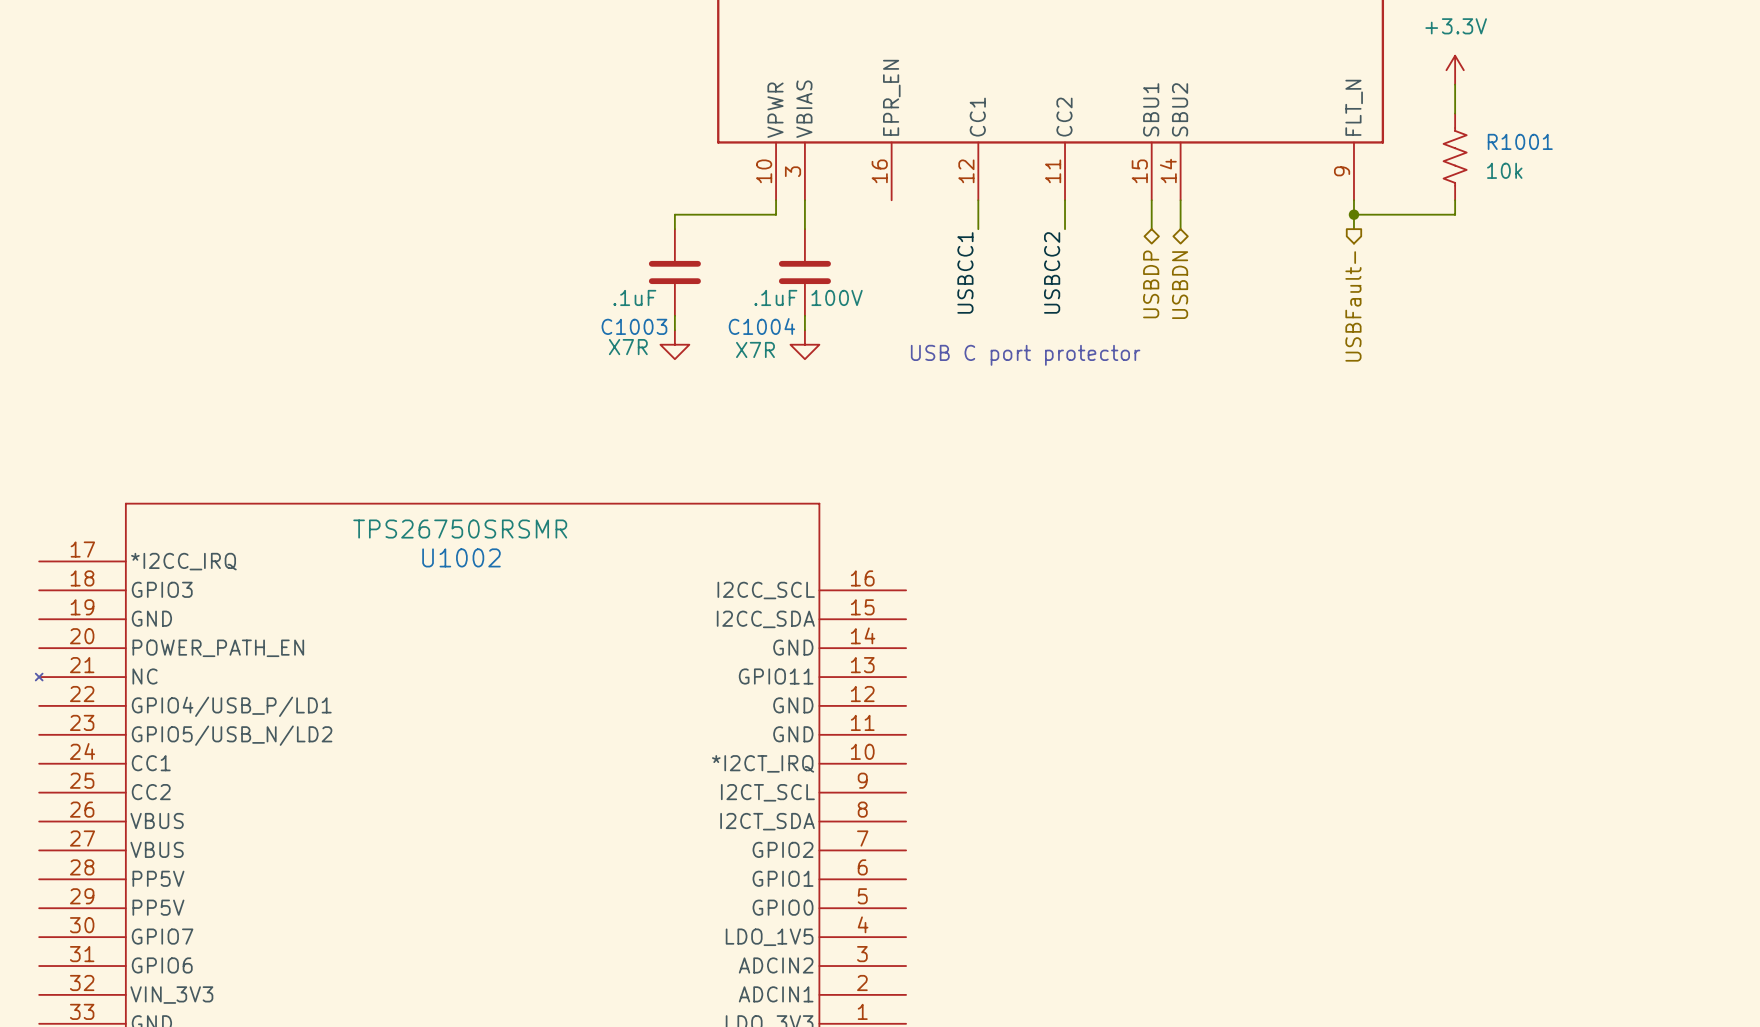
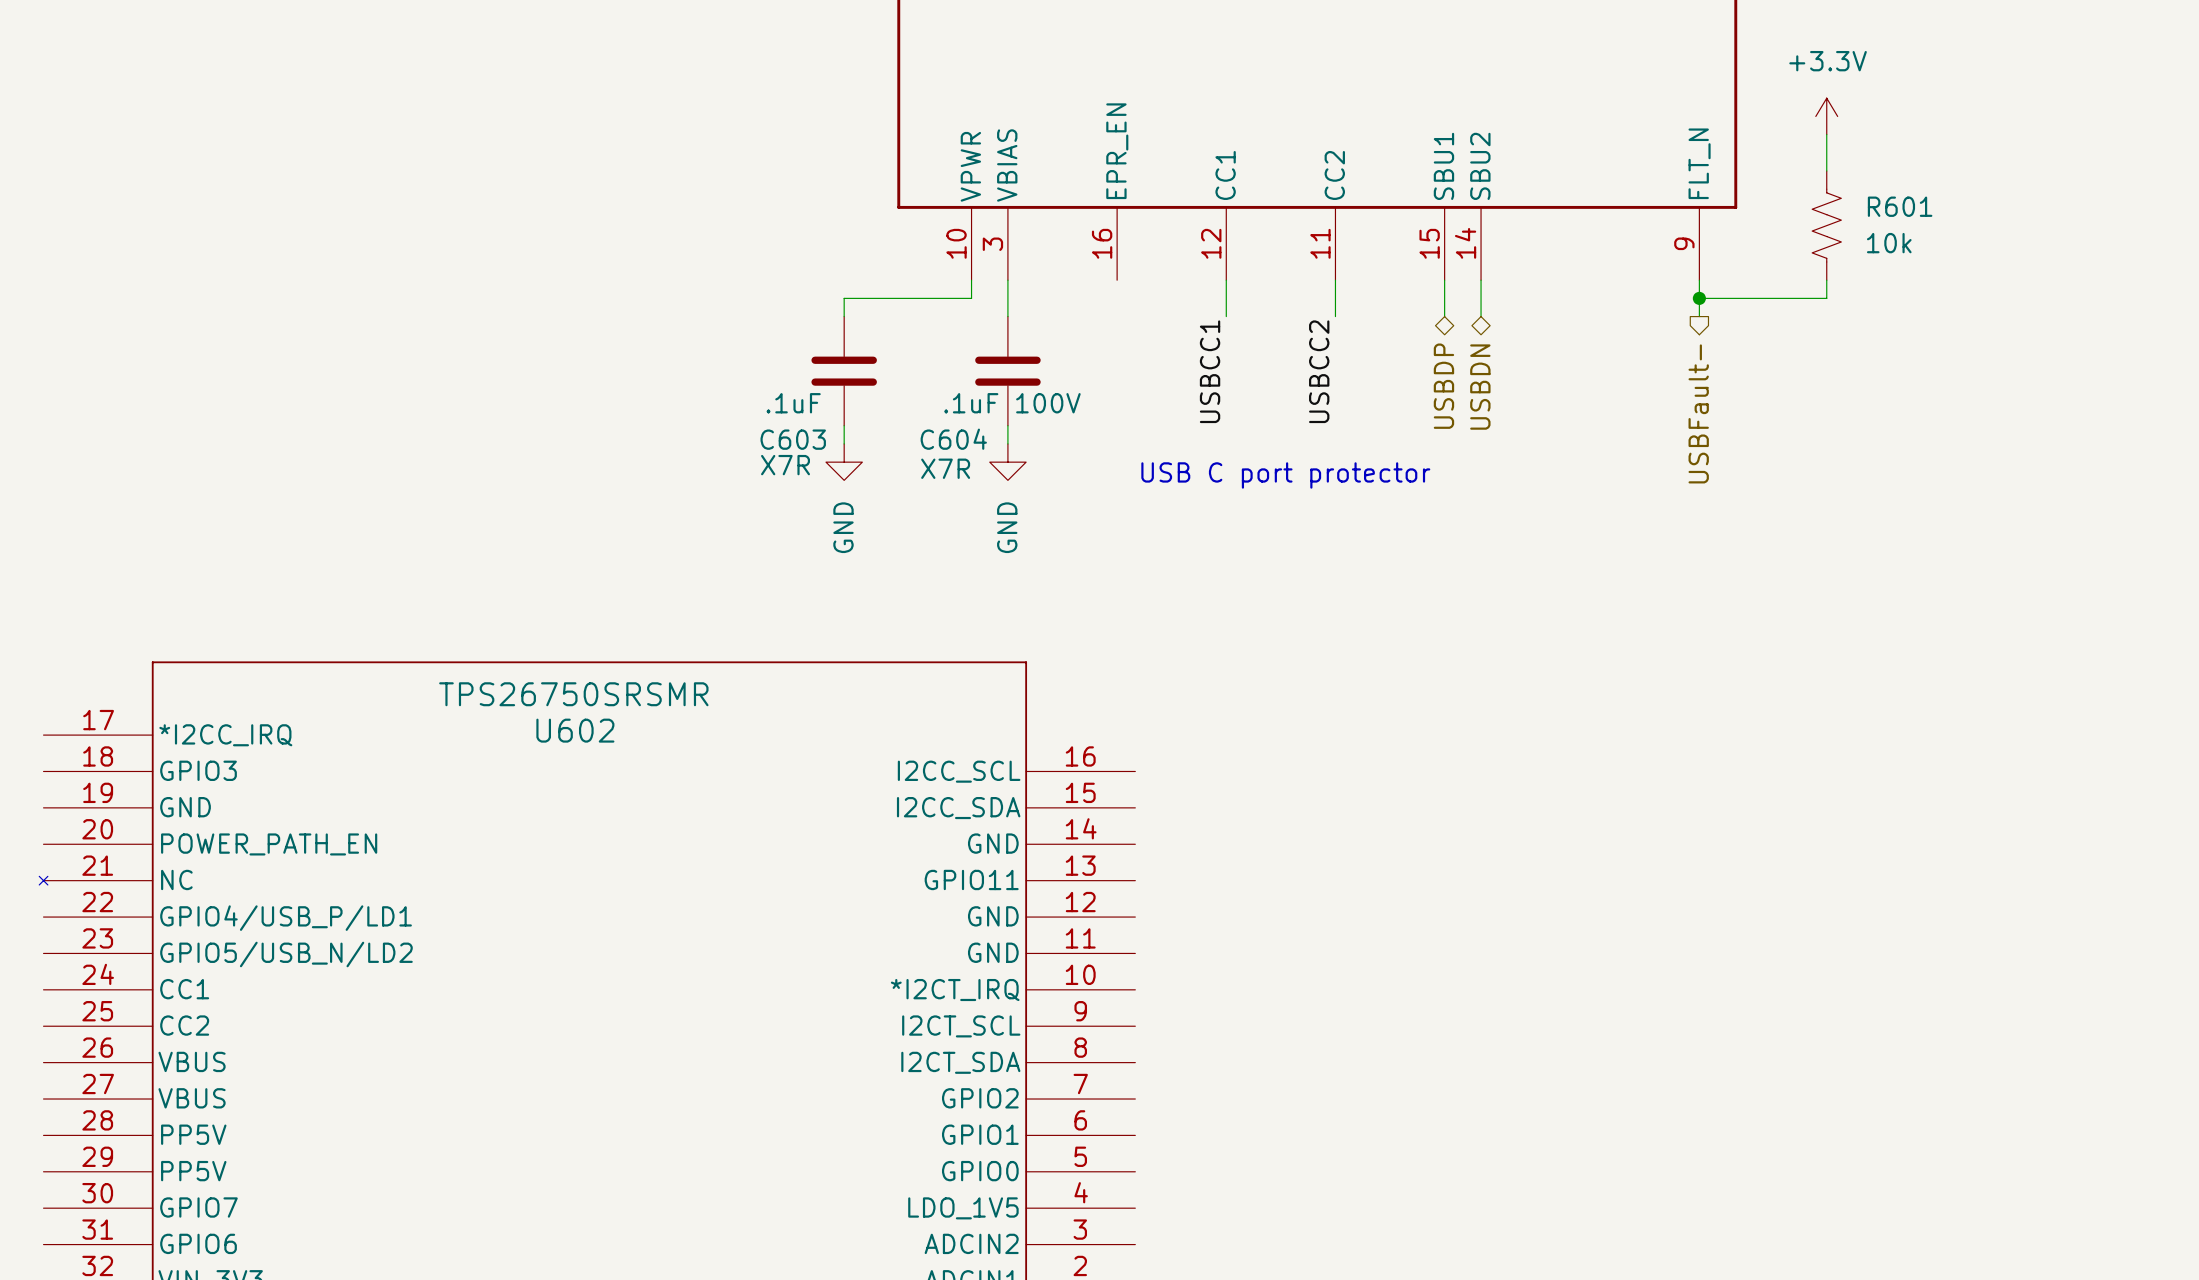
R1001 name: R1001 (1520, 141) -> R601 (1900, 206)
C1003 name: C1003 (634, 326) -> C603 (793, 439)
C1004 name: C1004 (761, 326) -> C604 (953, 439)
power symbol text: none -> GND (843, 527)
power symbol text: none -> GND (1007, 527)
U1002 name: U1002 (461, 557) -> U602 (575, 730)

